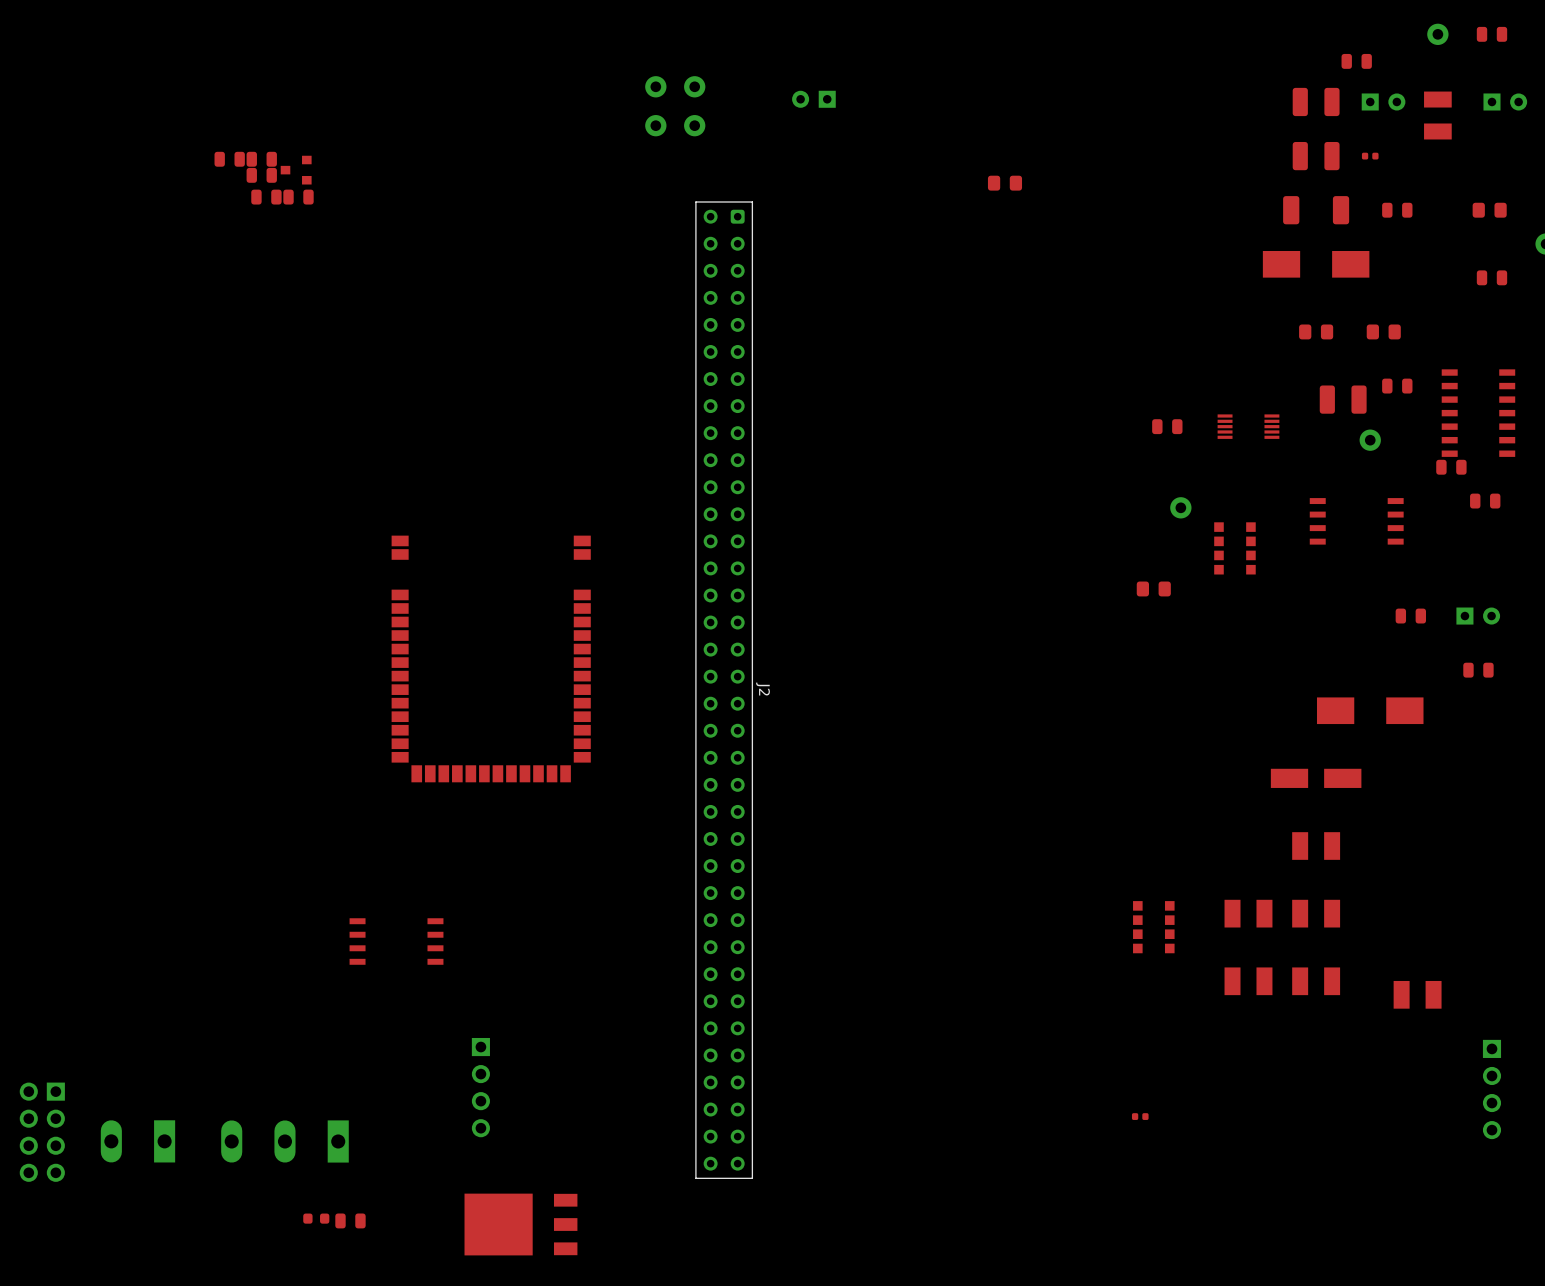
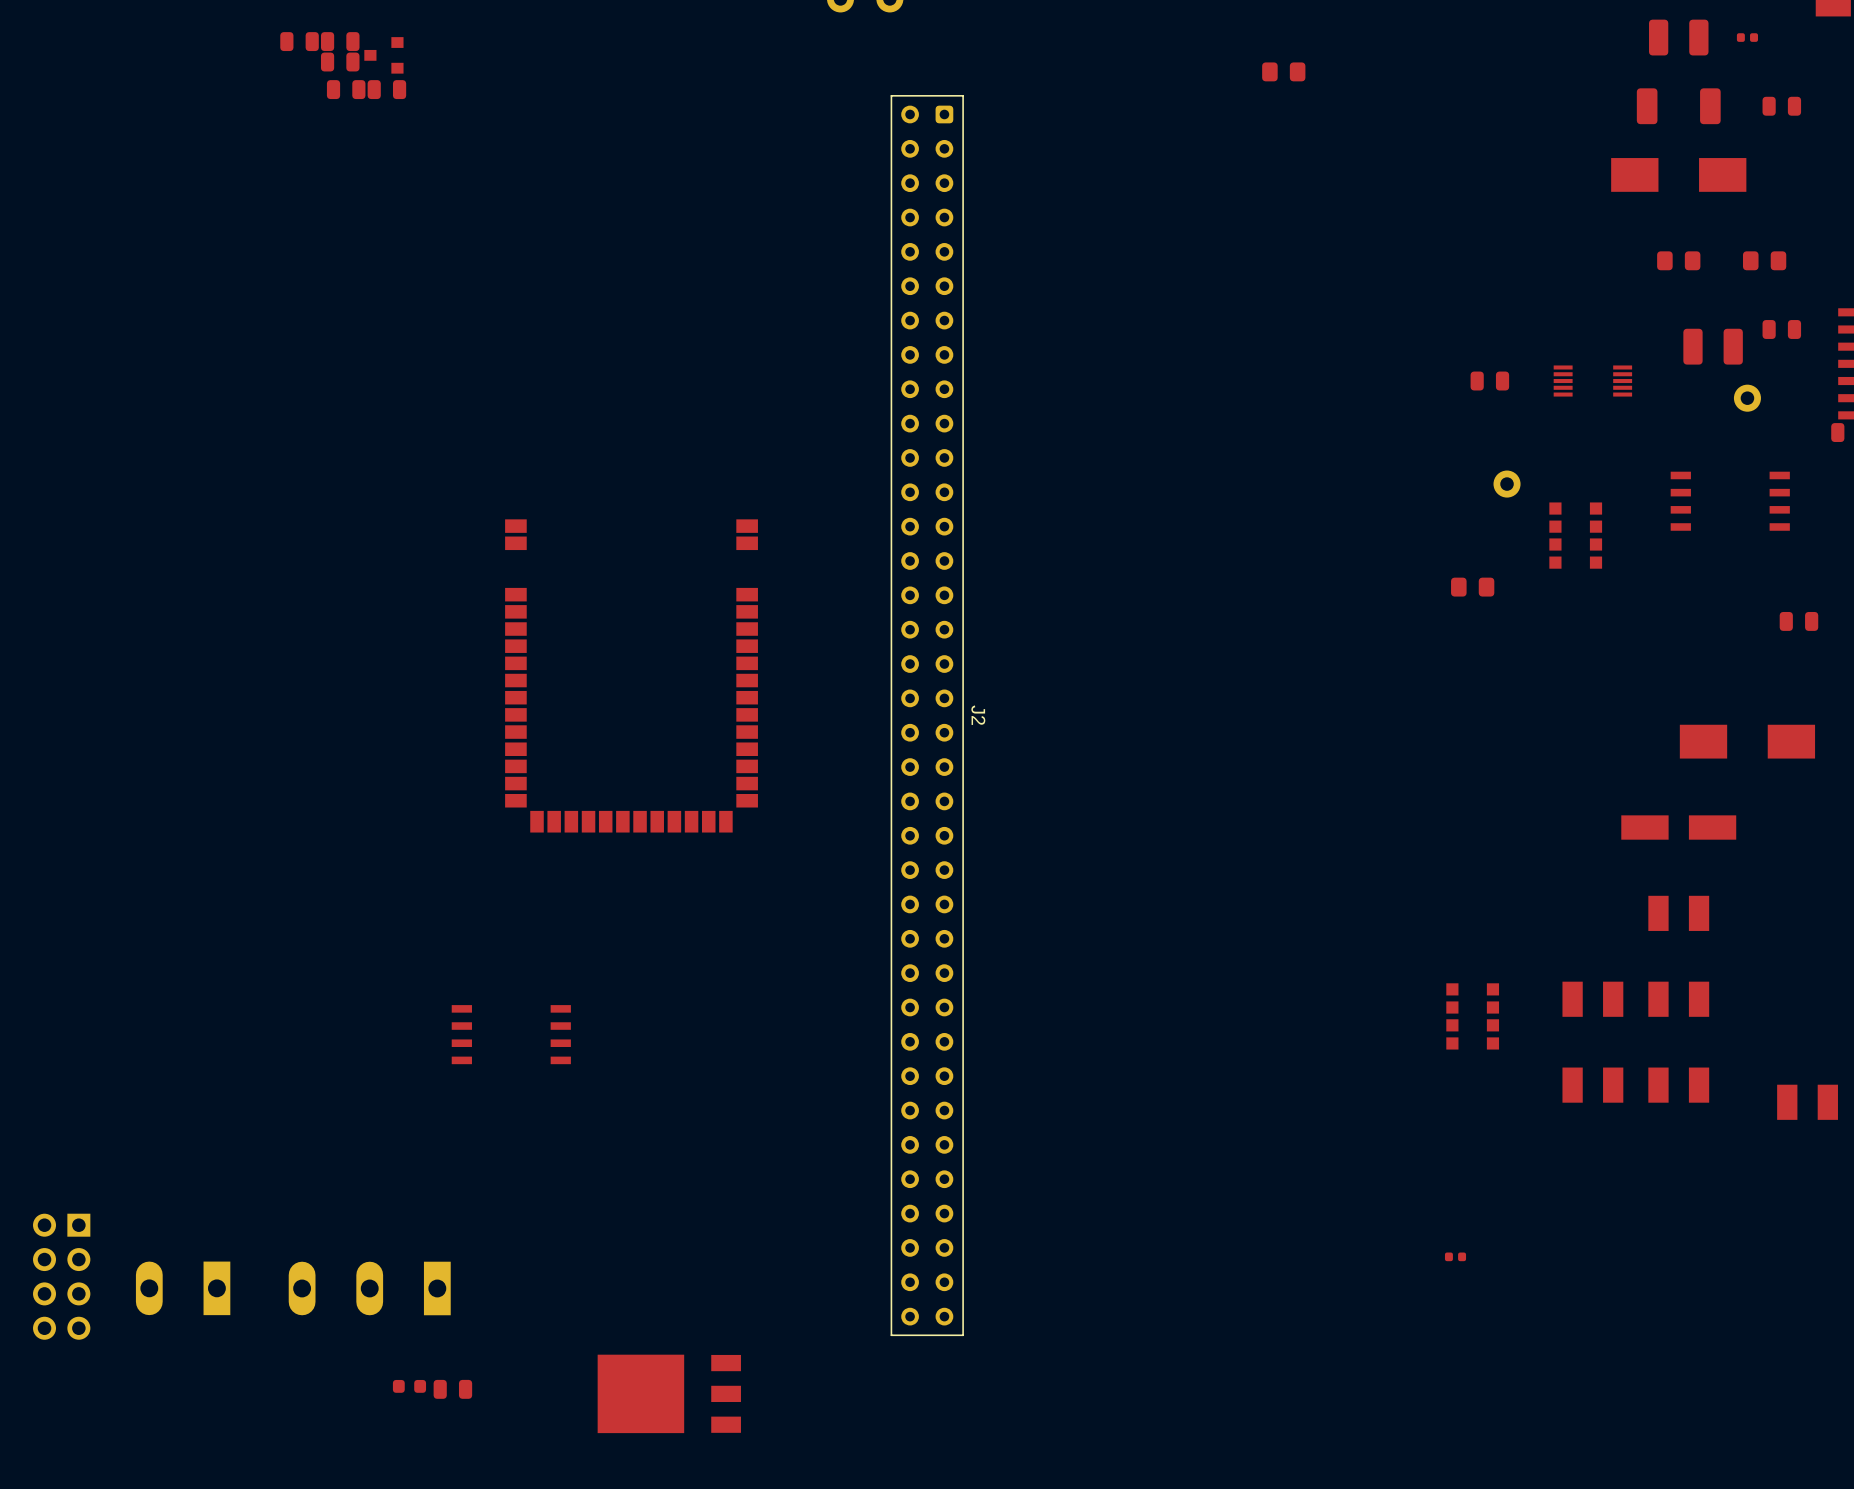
part: (480, 1087) -> none

